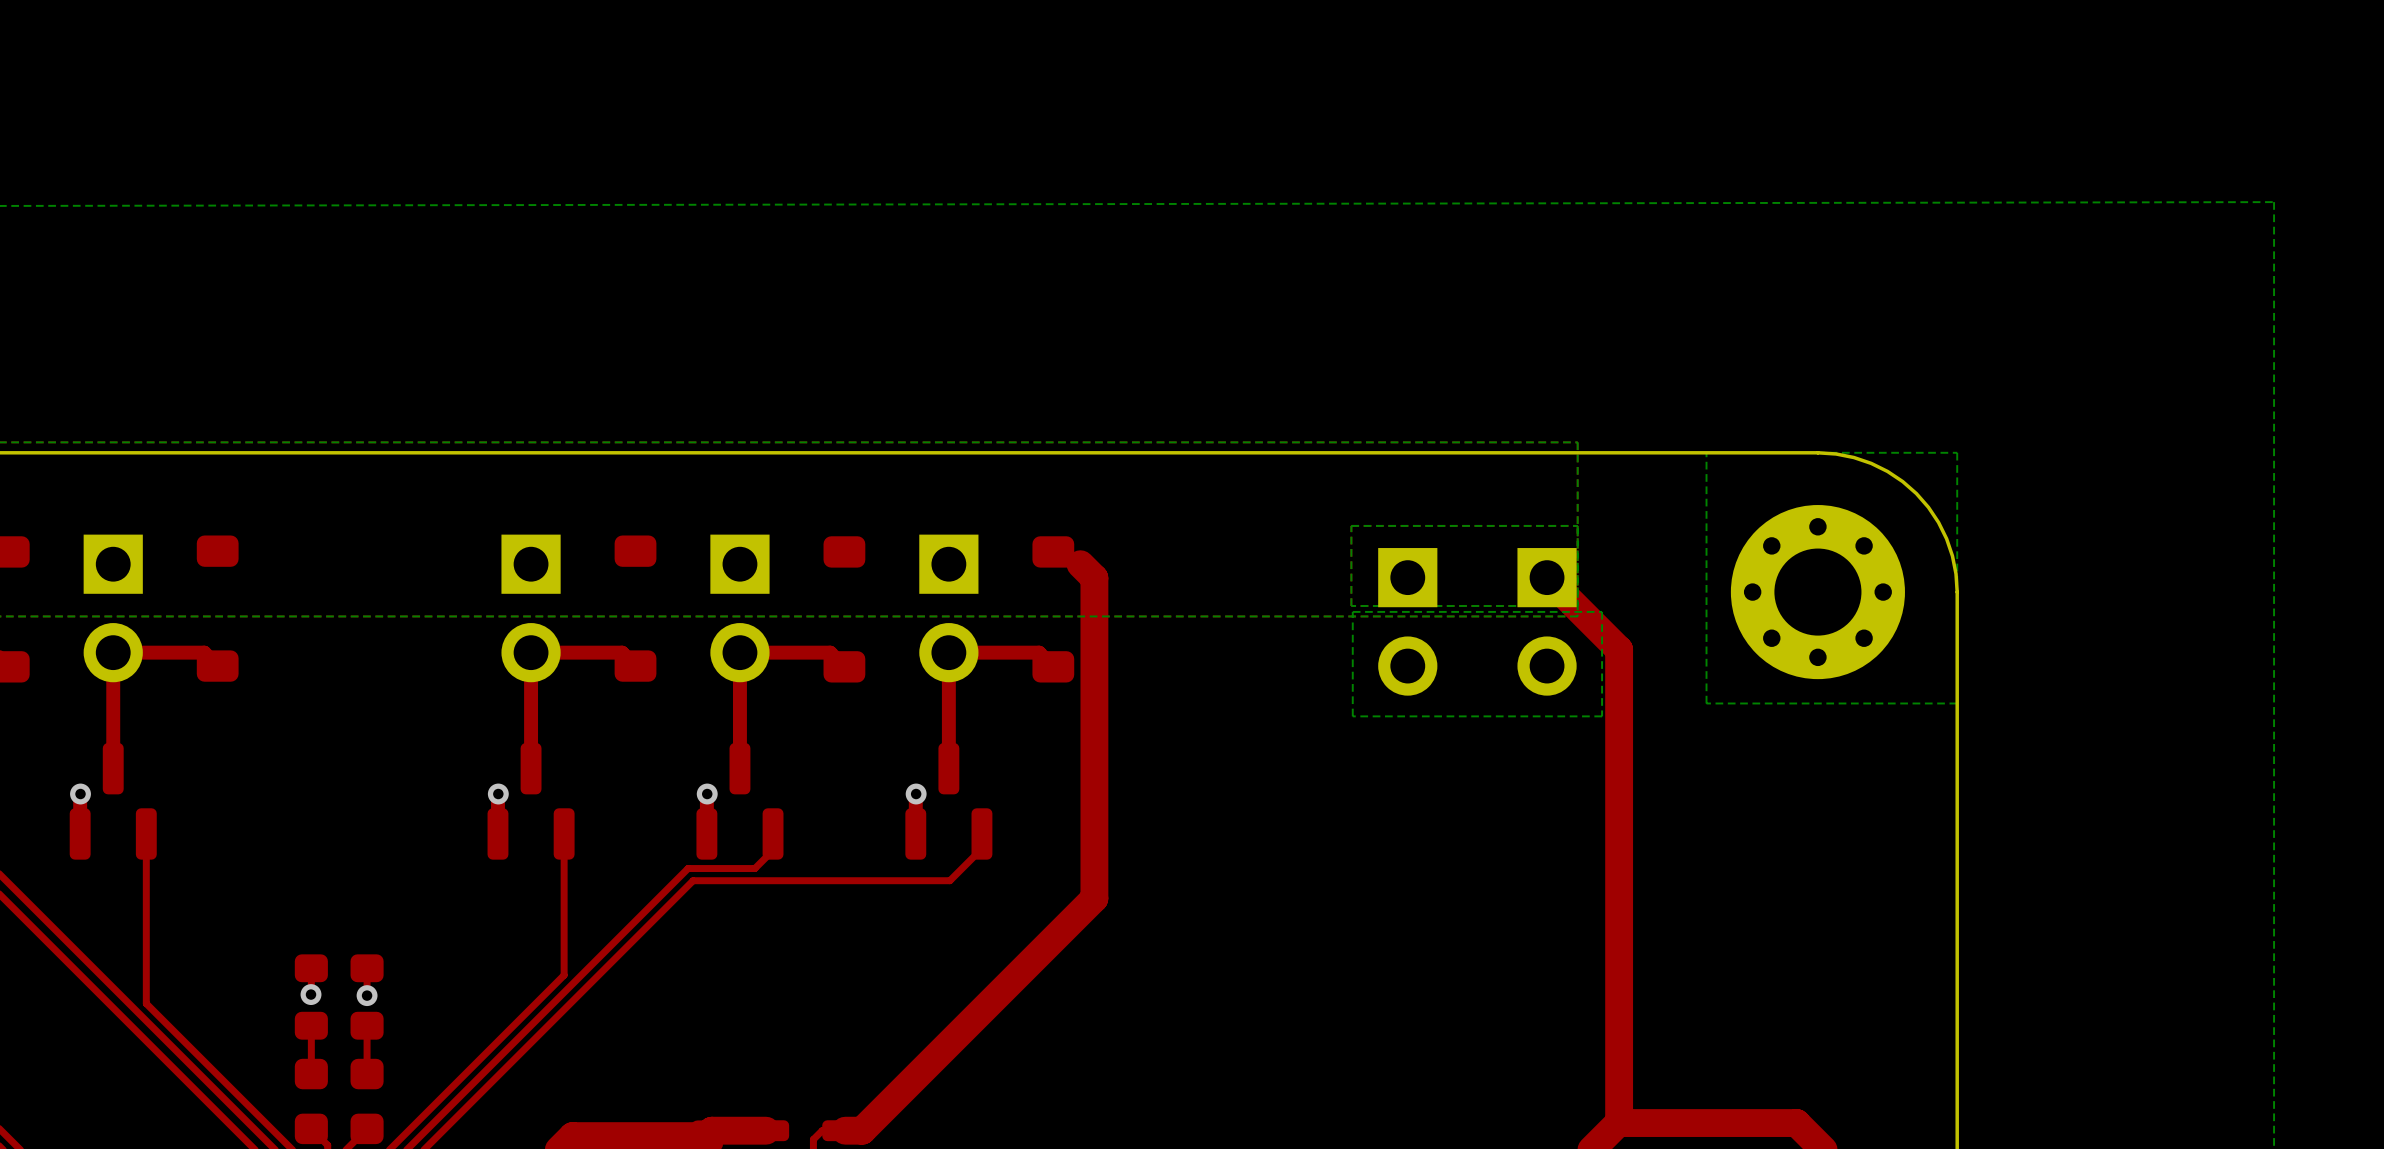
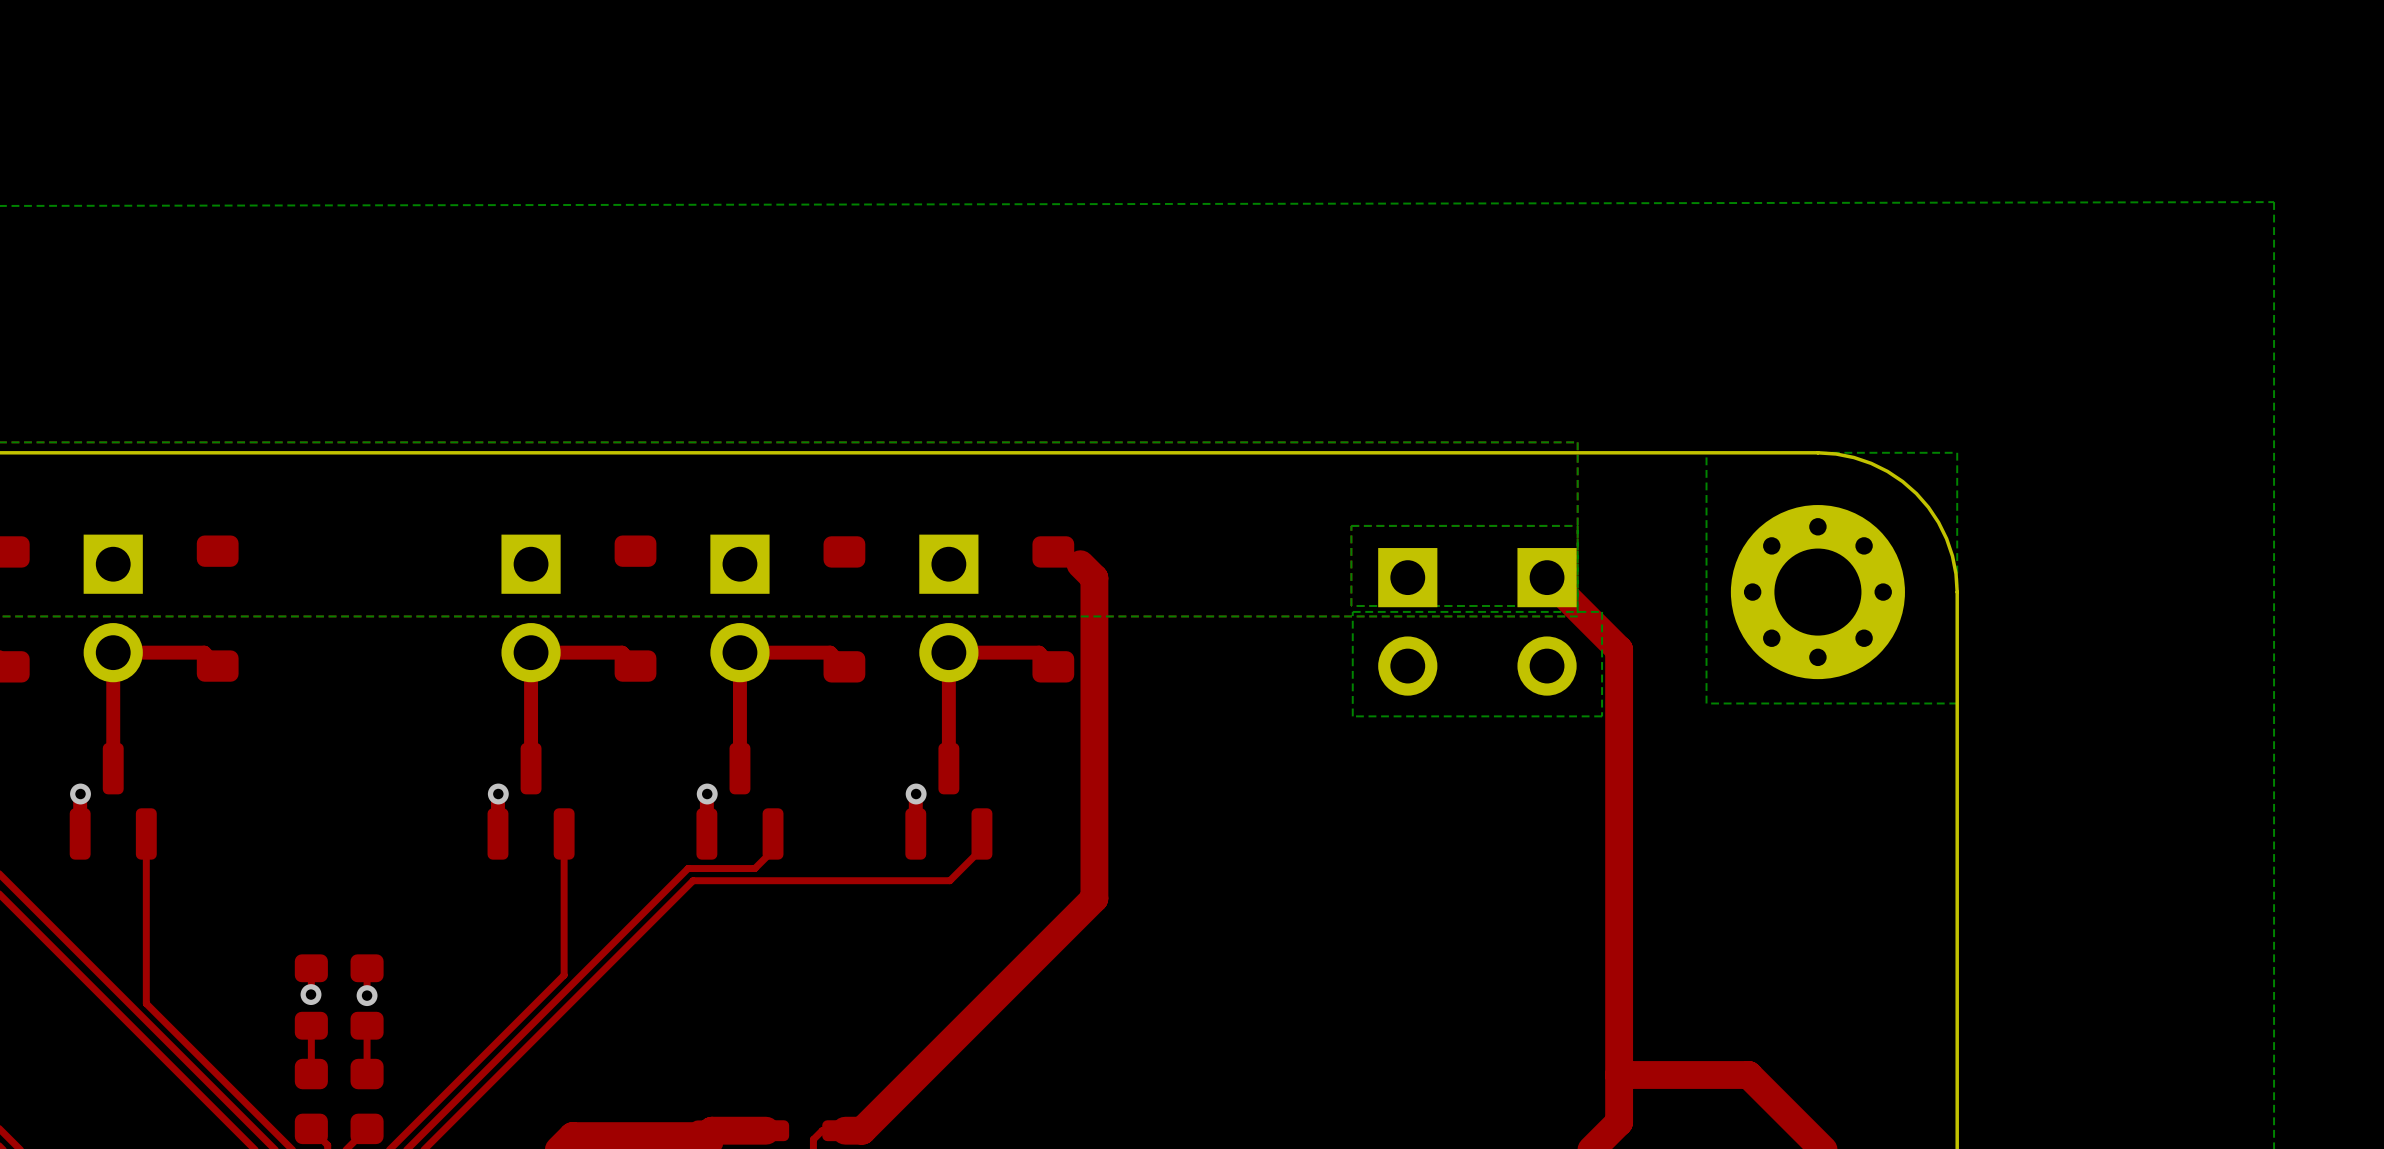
top track: (1619, 1122) (1796, 1123) -> (1619, 1074) (1748, 1074) (1796, 1123)

